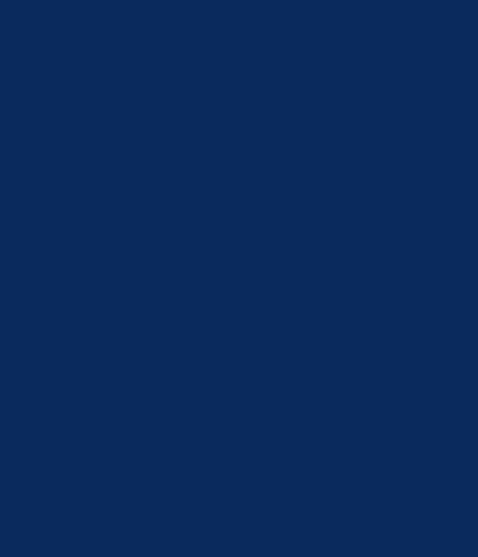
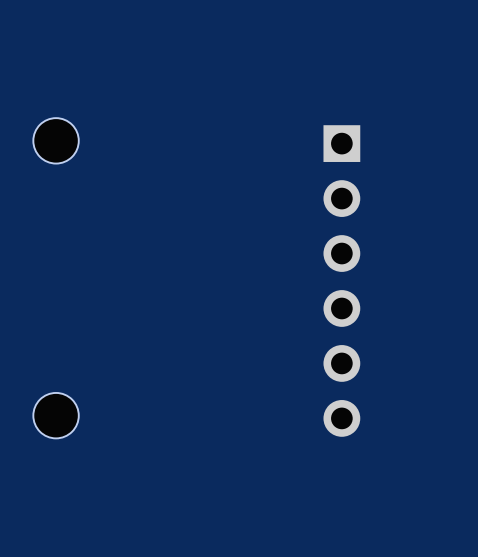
part: none -> (56, 140)
part: none -> (341, 281)
part: none -> (56, 415)

